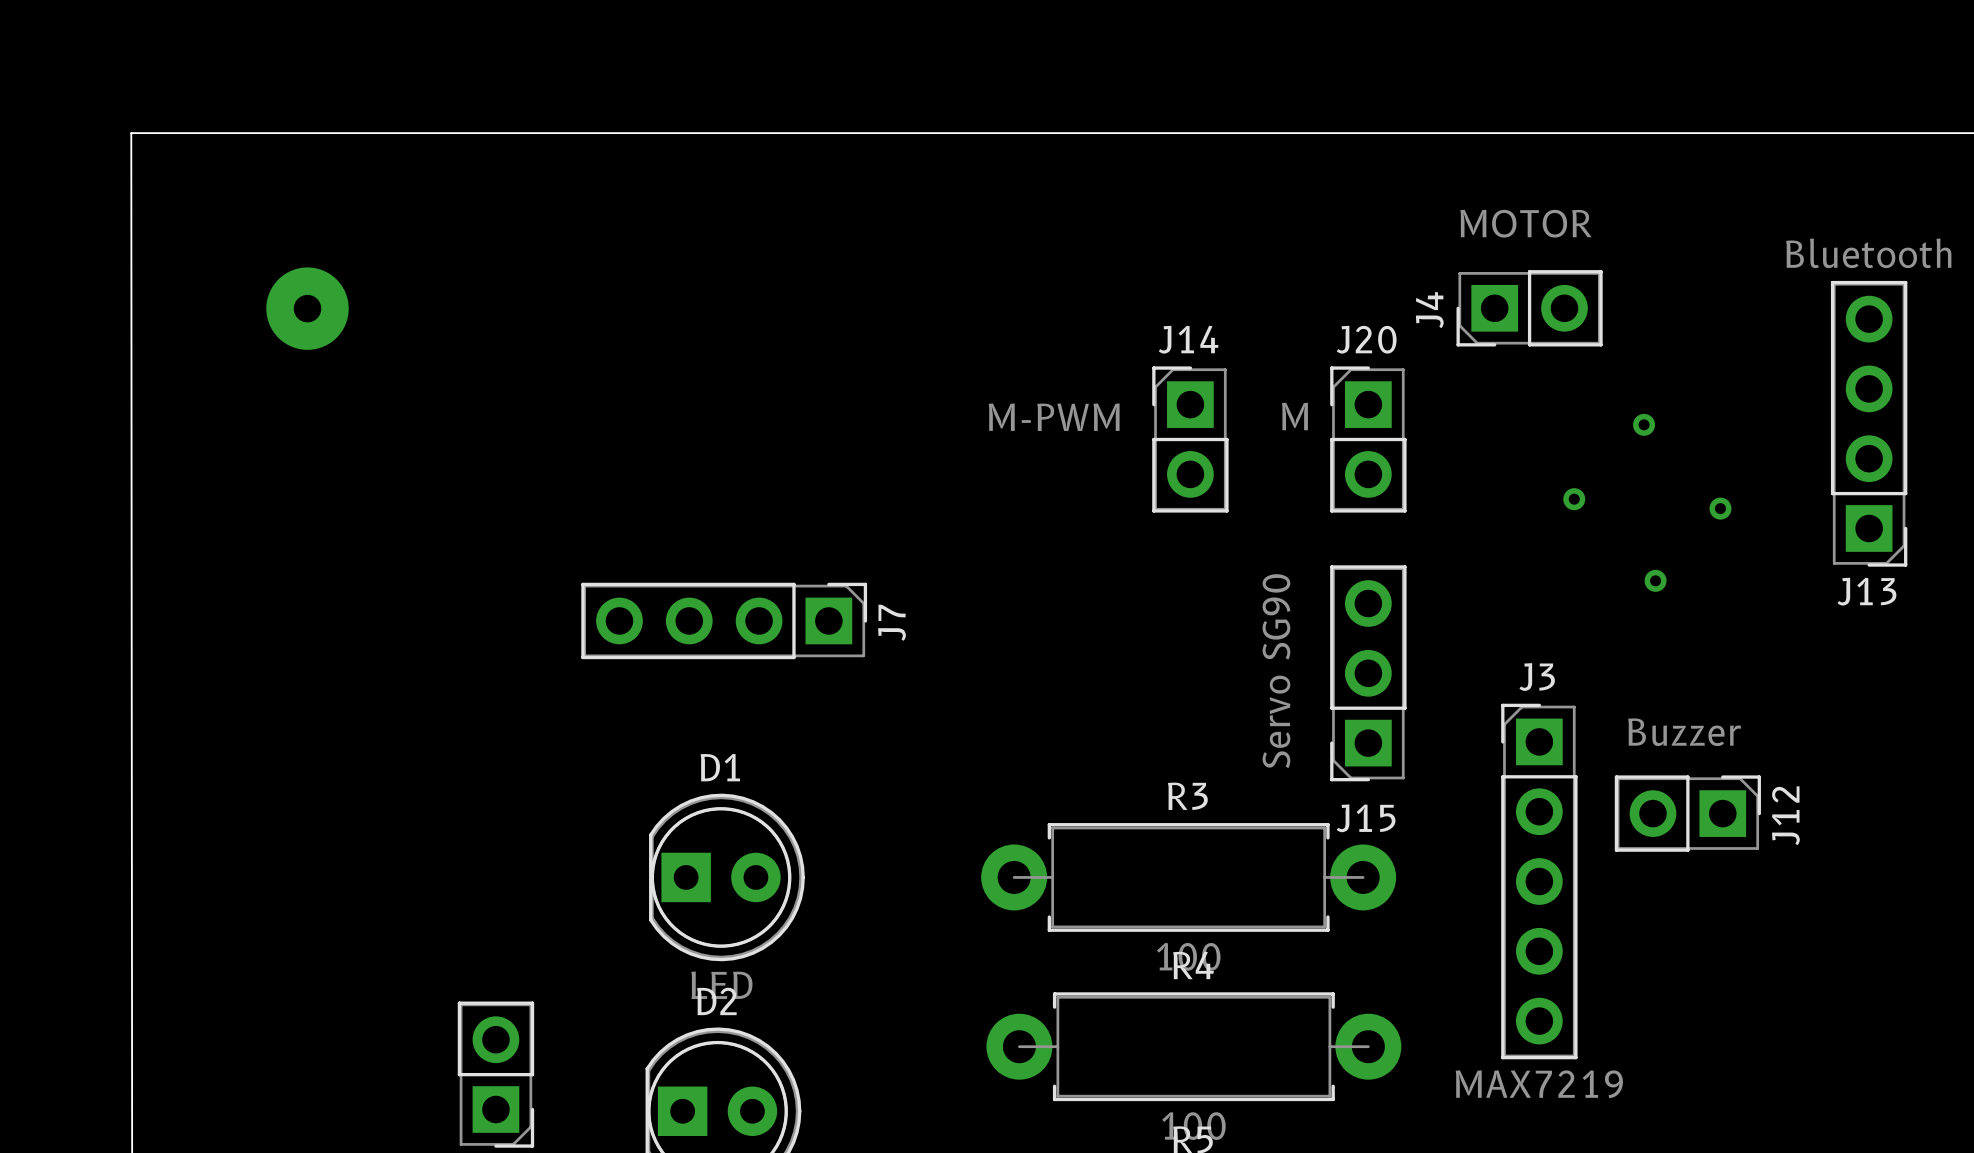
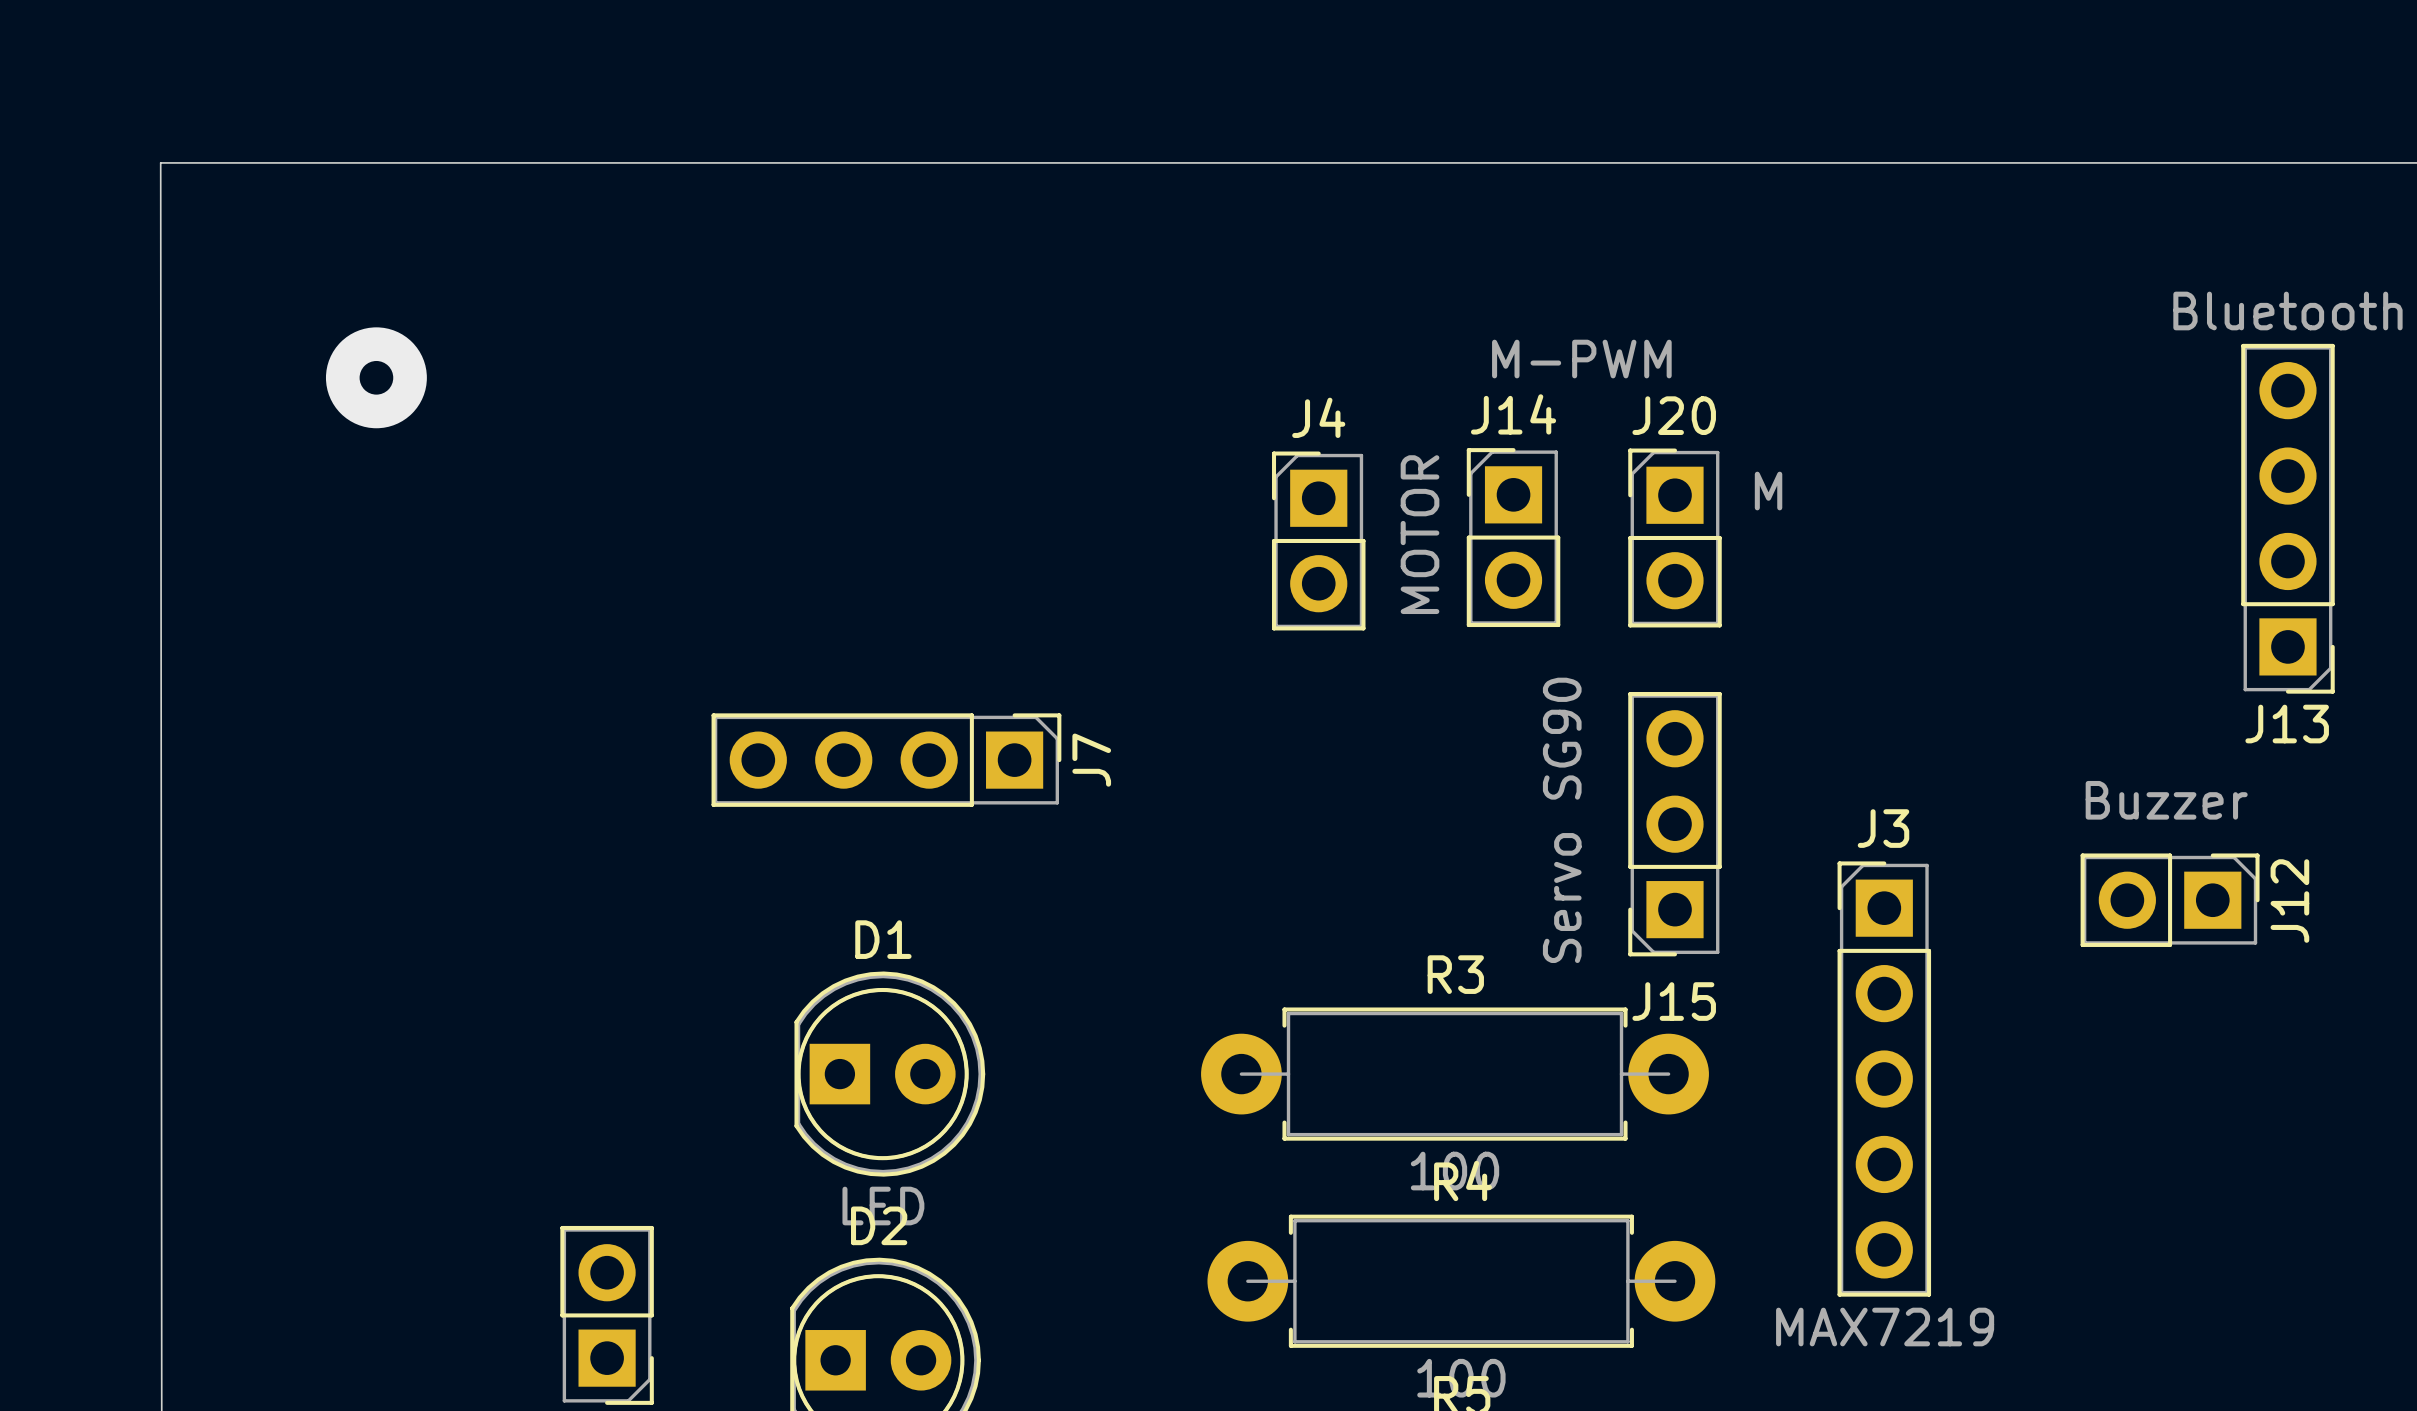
J4 rotation: 0° (1529, 308) -> 90° clockwise (1318, 540)
J4 position: (1529, 308) -> (1318, 540)
J20 value position: M (1294, 416) -> M (1768, 491)
J14 value position: M-PWM (1054, 417) -> M-PWM (1581, 359)
via: (1644, 424) -> none
J14 position: (1190, 439) -> (1513, 537)
via: (1574, 499) -> none
via: (1720, 508) -> none
via: (1655, 580) -> none
J12 position: (1687, 813) -> (2170, 900)

